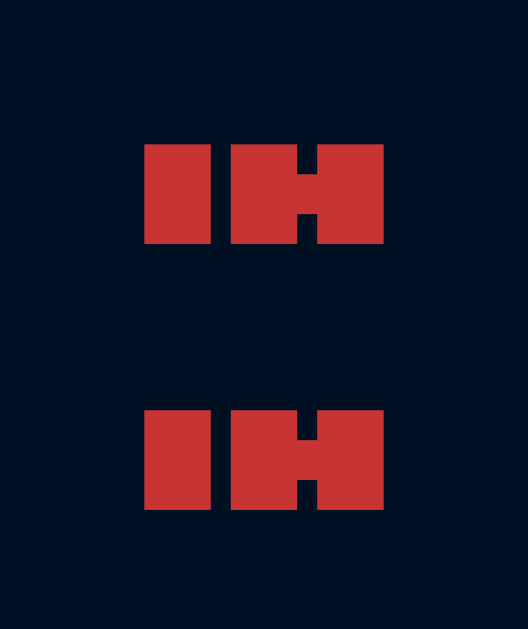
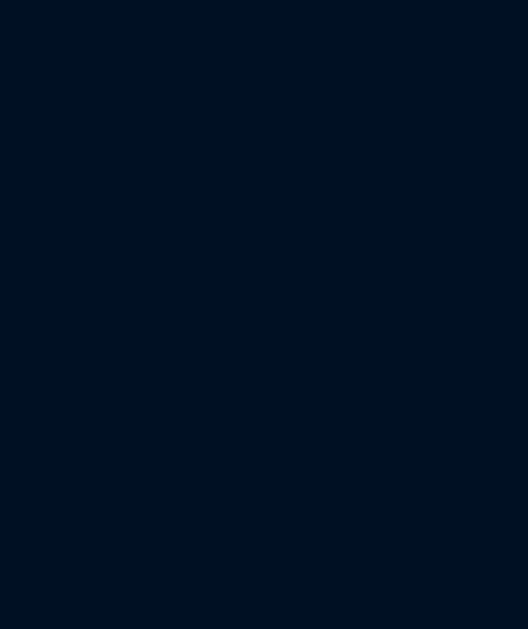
part: (263, 194) -> none
part: (263, 460) -> none

